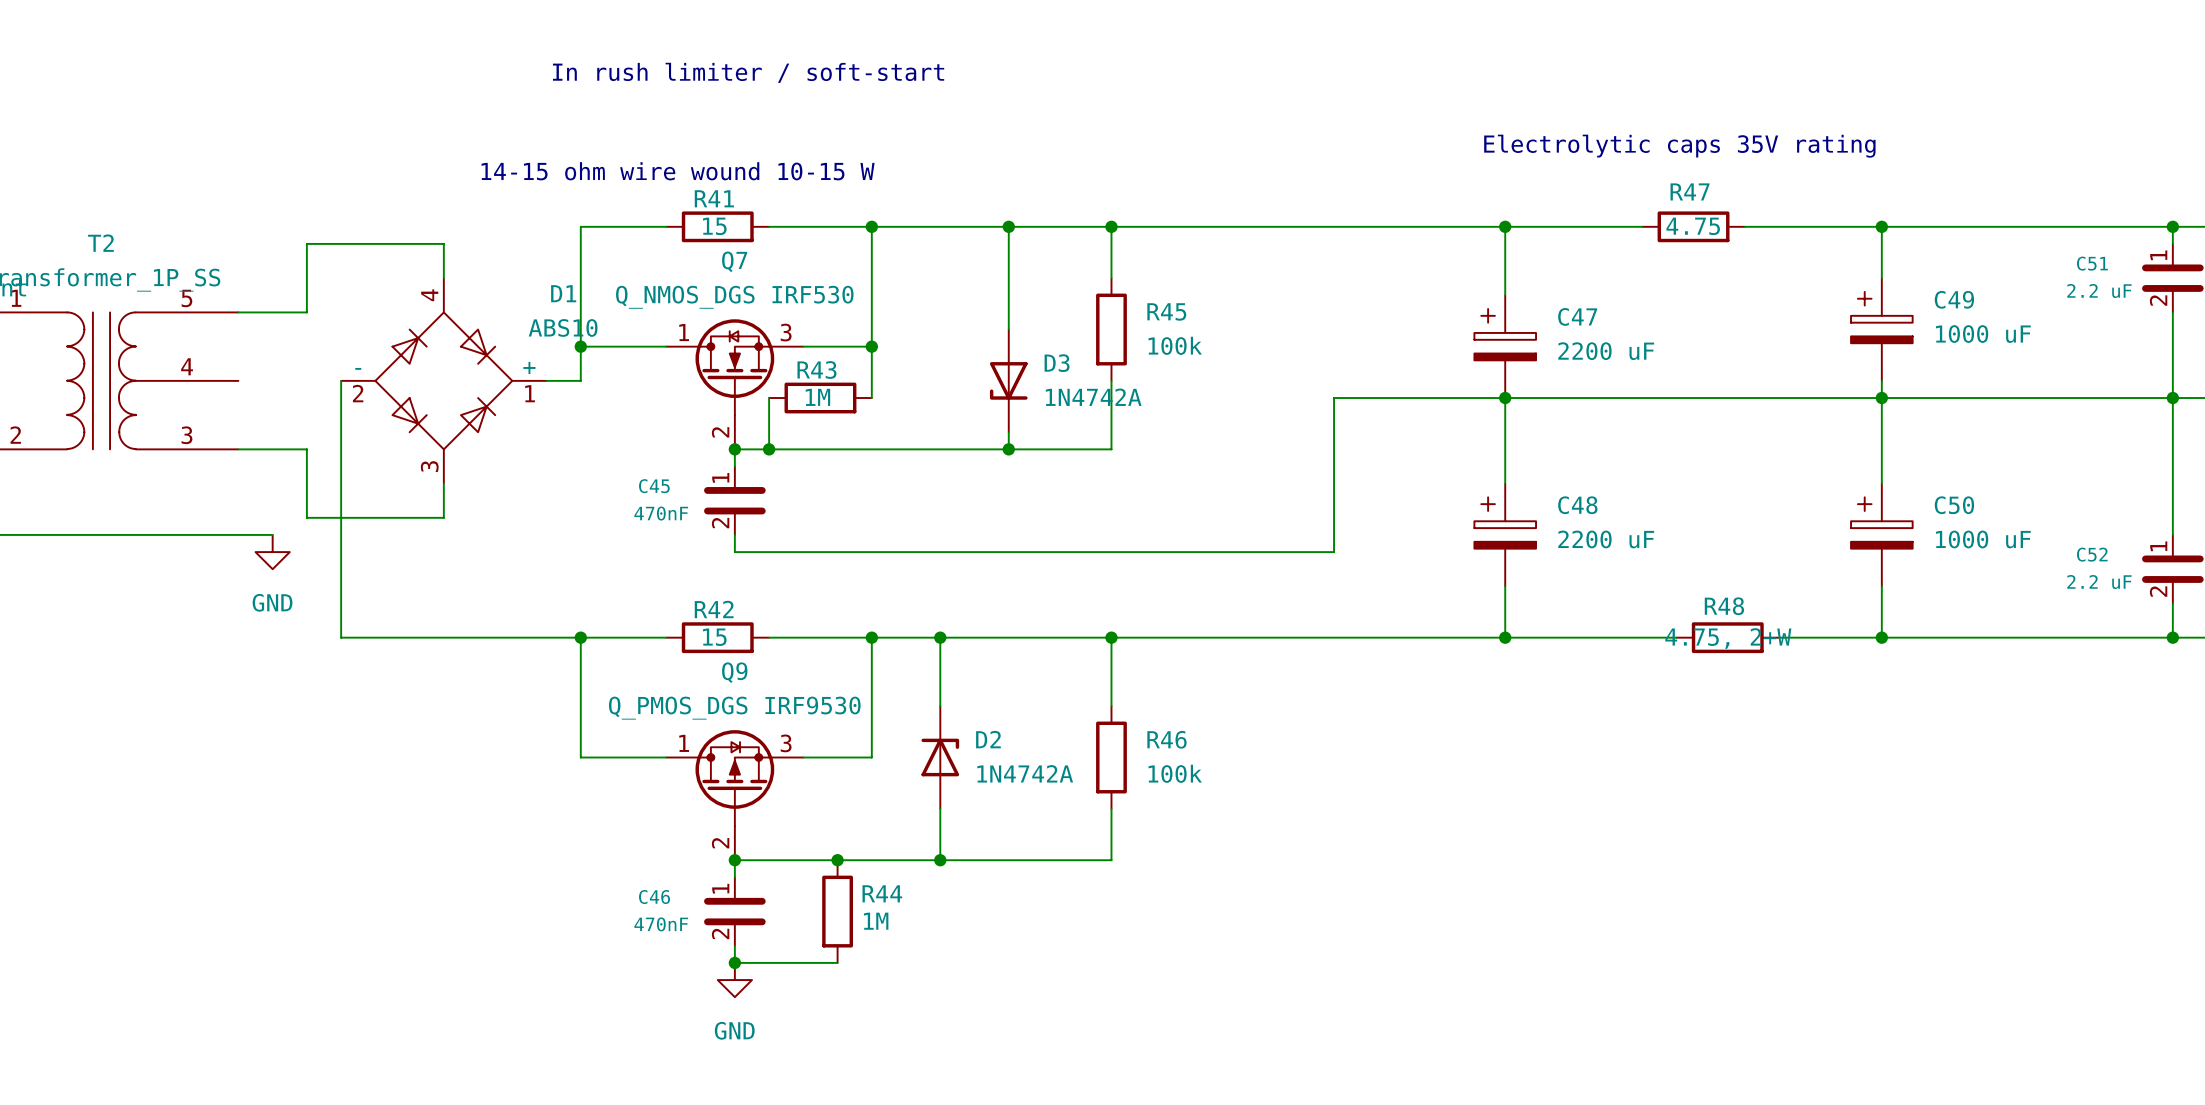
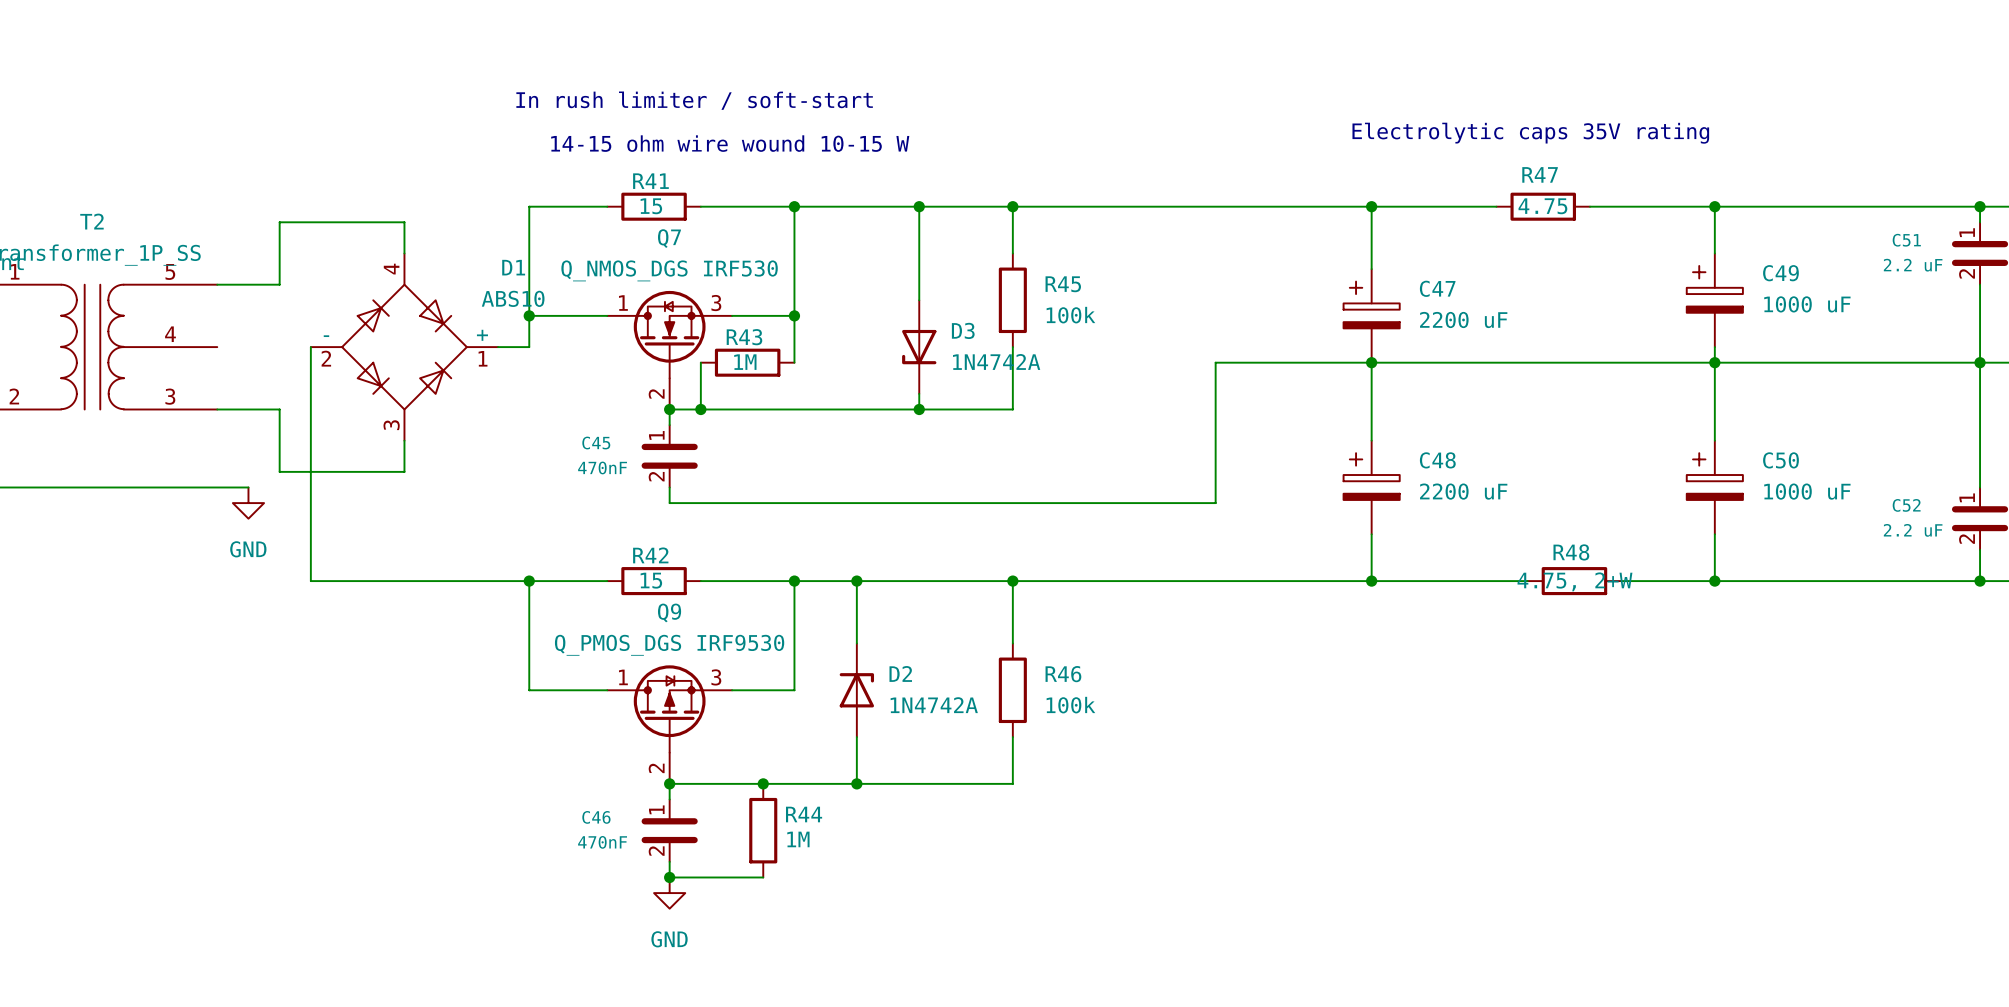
text position: In rush limiter / soft-start (748, 72) -> In rush limiter / soft-start (694, 100)
text position: 14-15 ohm wire wound 10-15 W (678, 171) -> 14-15 ohm wire wound 10-15 W (730, 143)

